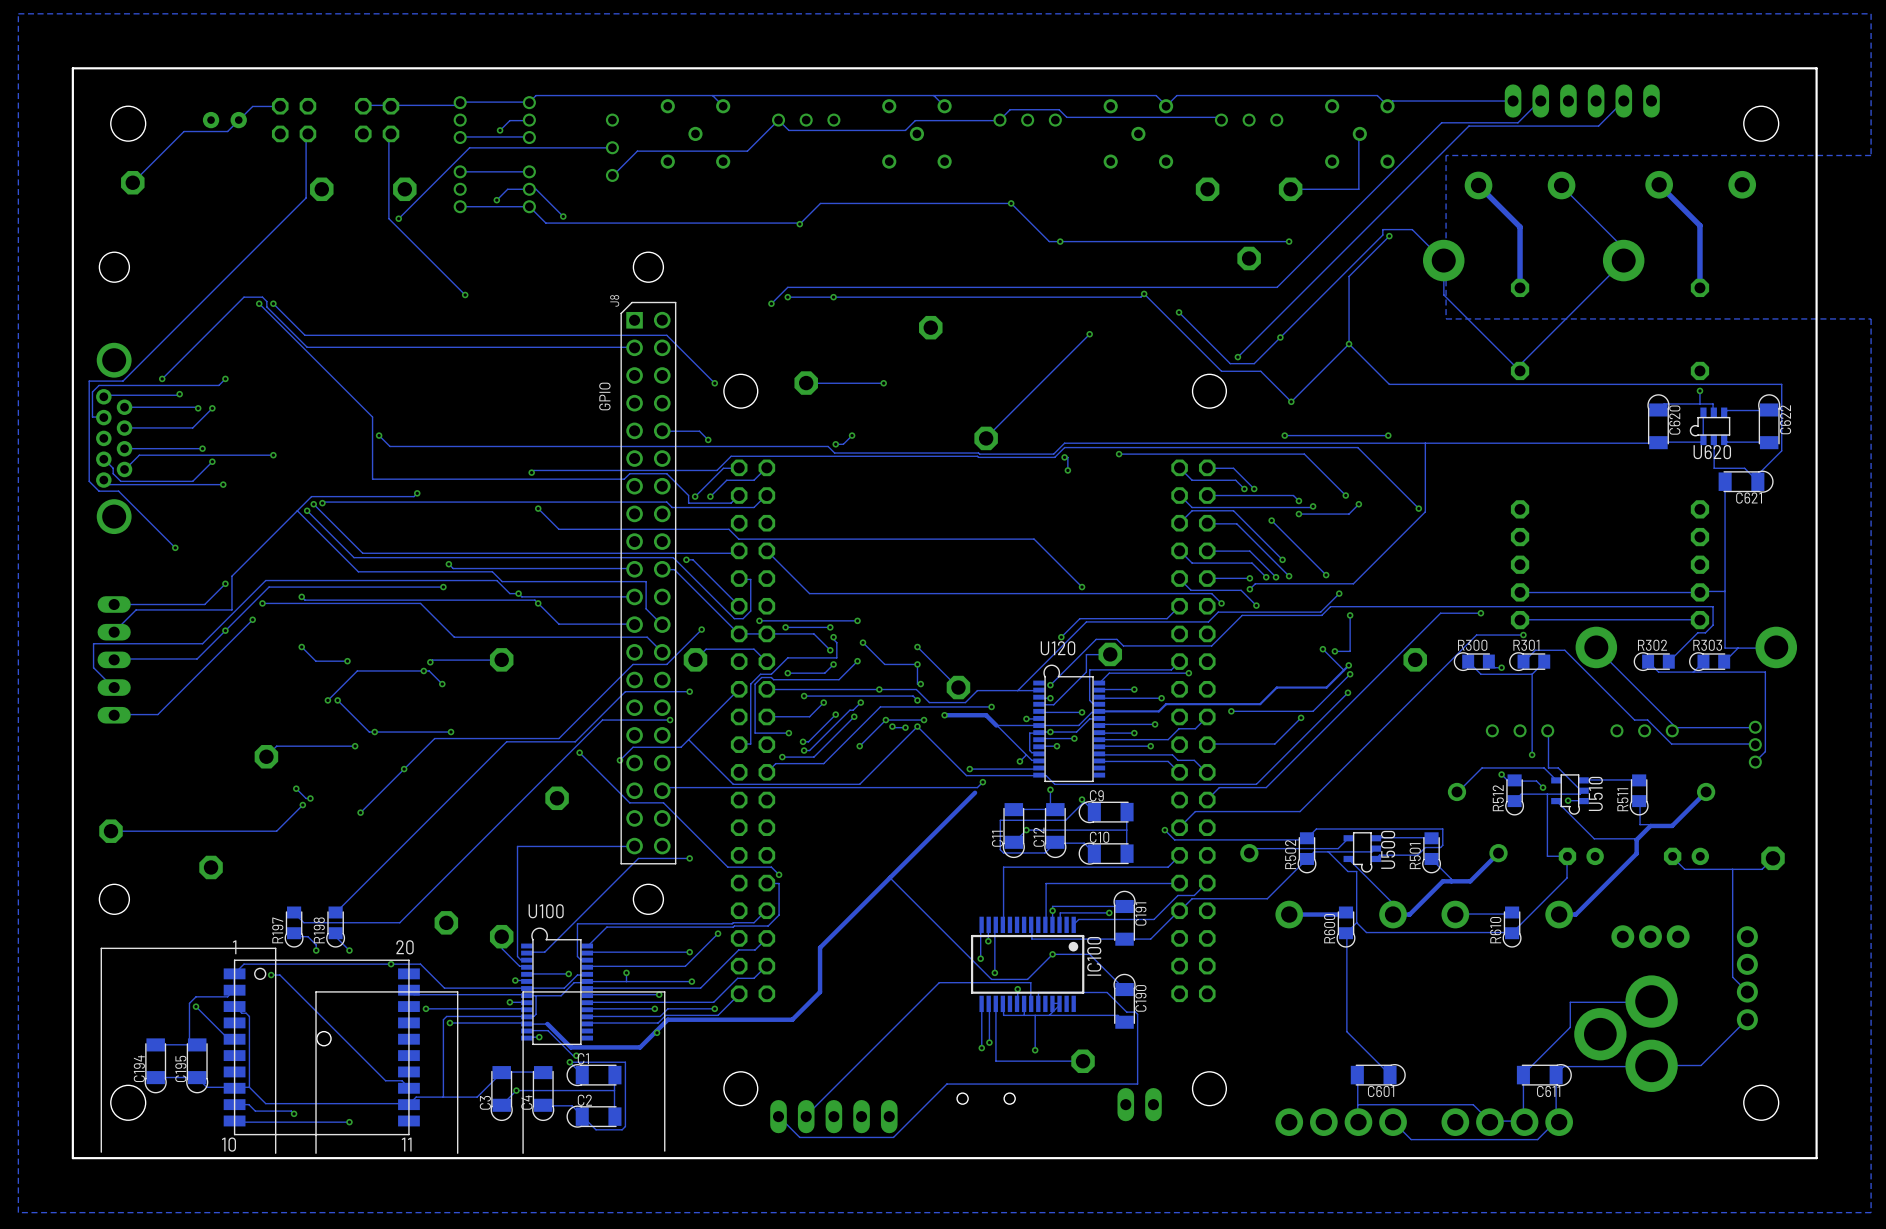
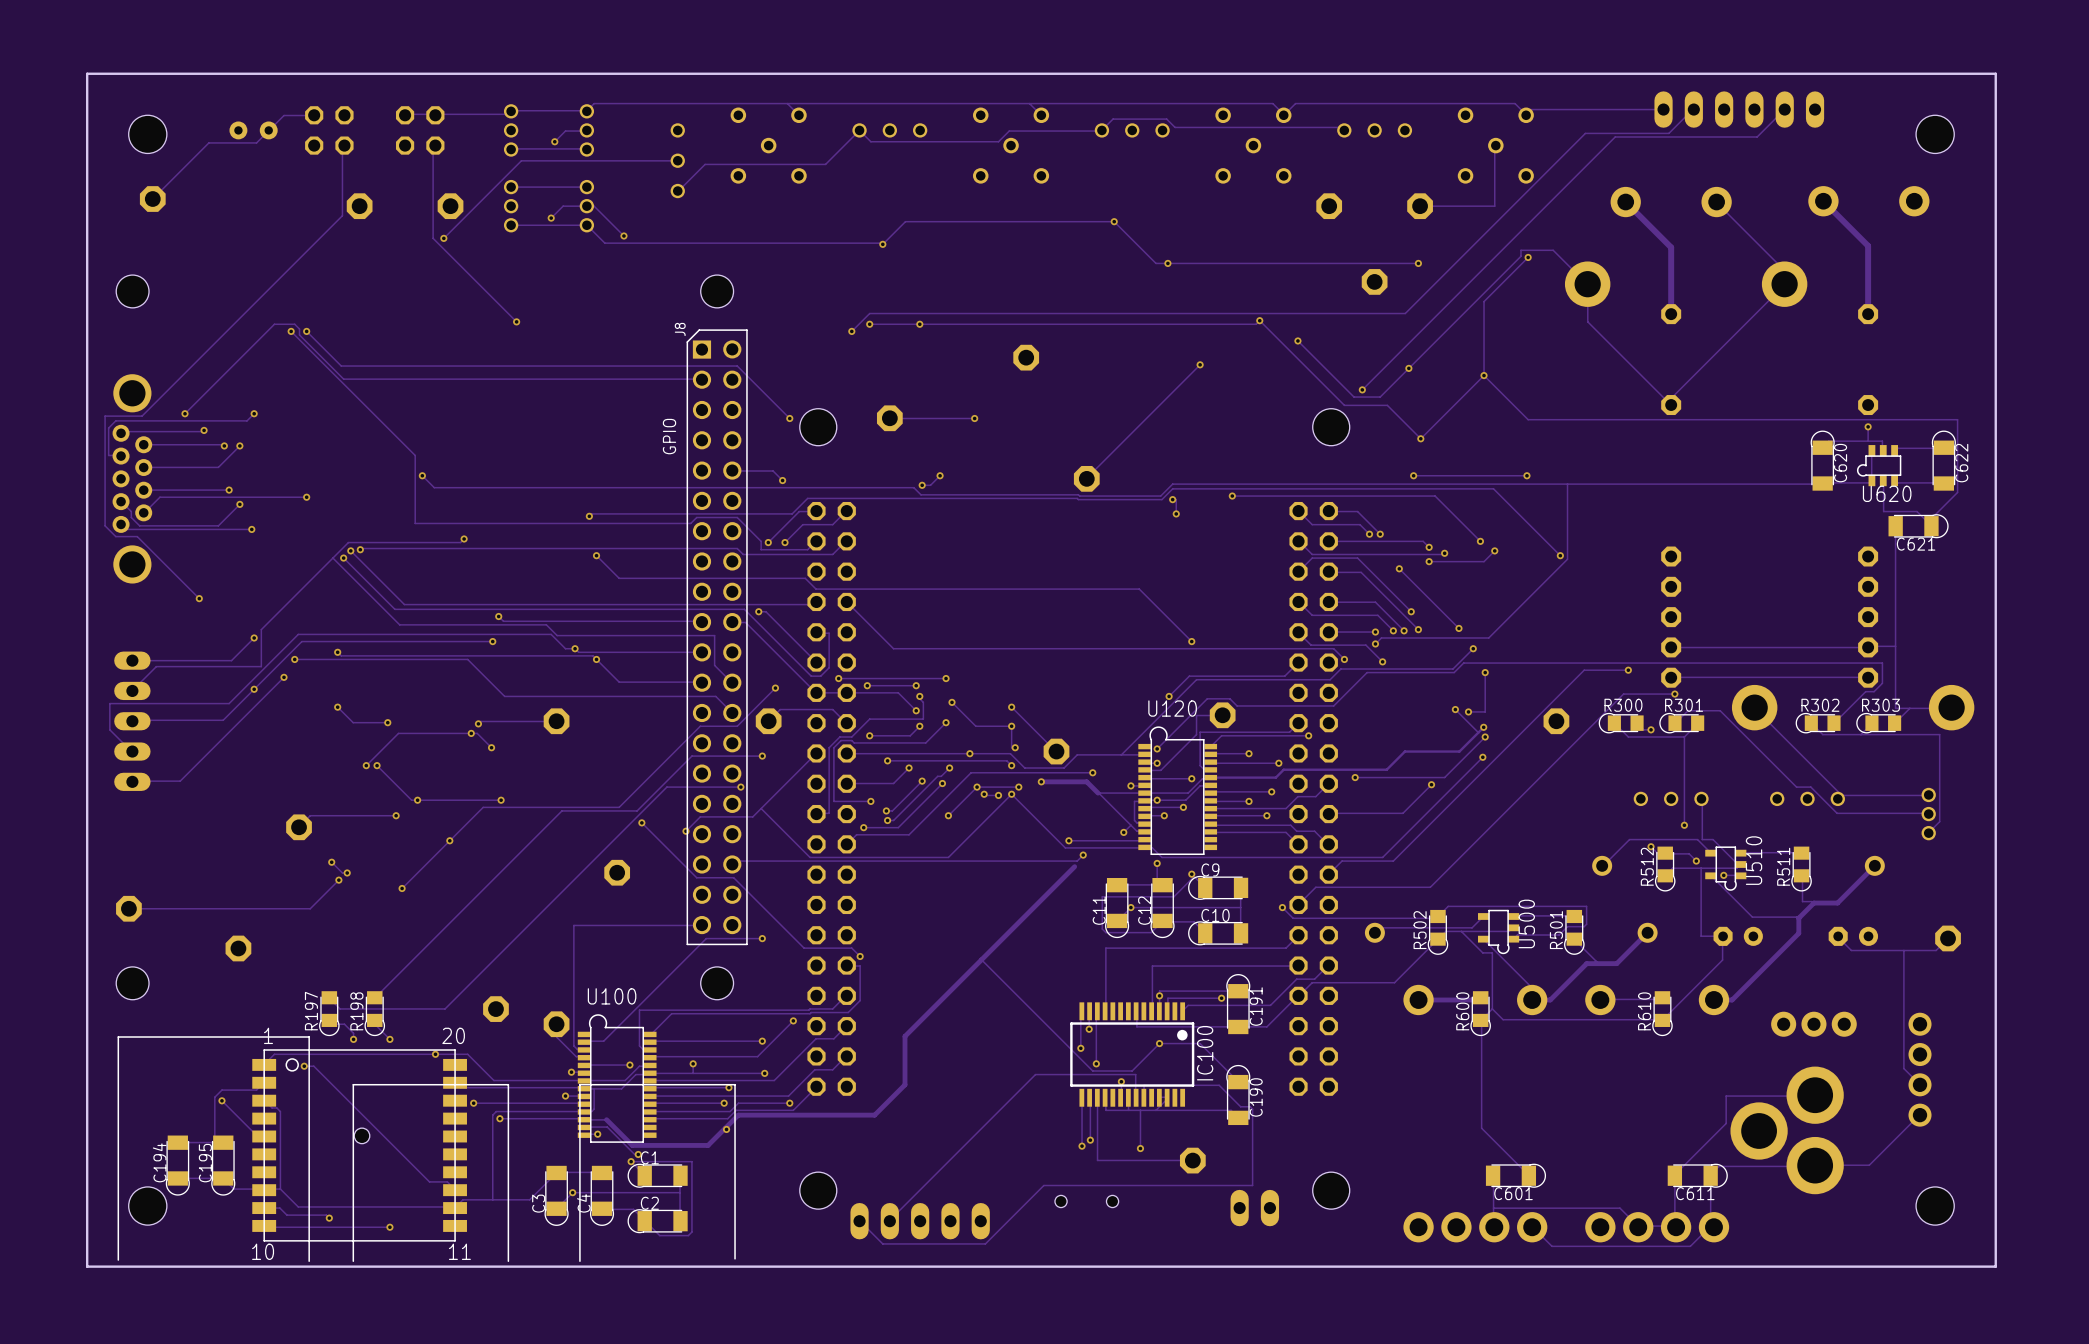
zone outline: (1871, 13) (18, 13) (18, 1212) (1871, 1212) (1871, 318) (1446, 318) (1446, 155) (1871, 155) (1871, 13) -> none

